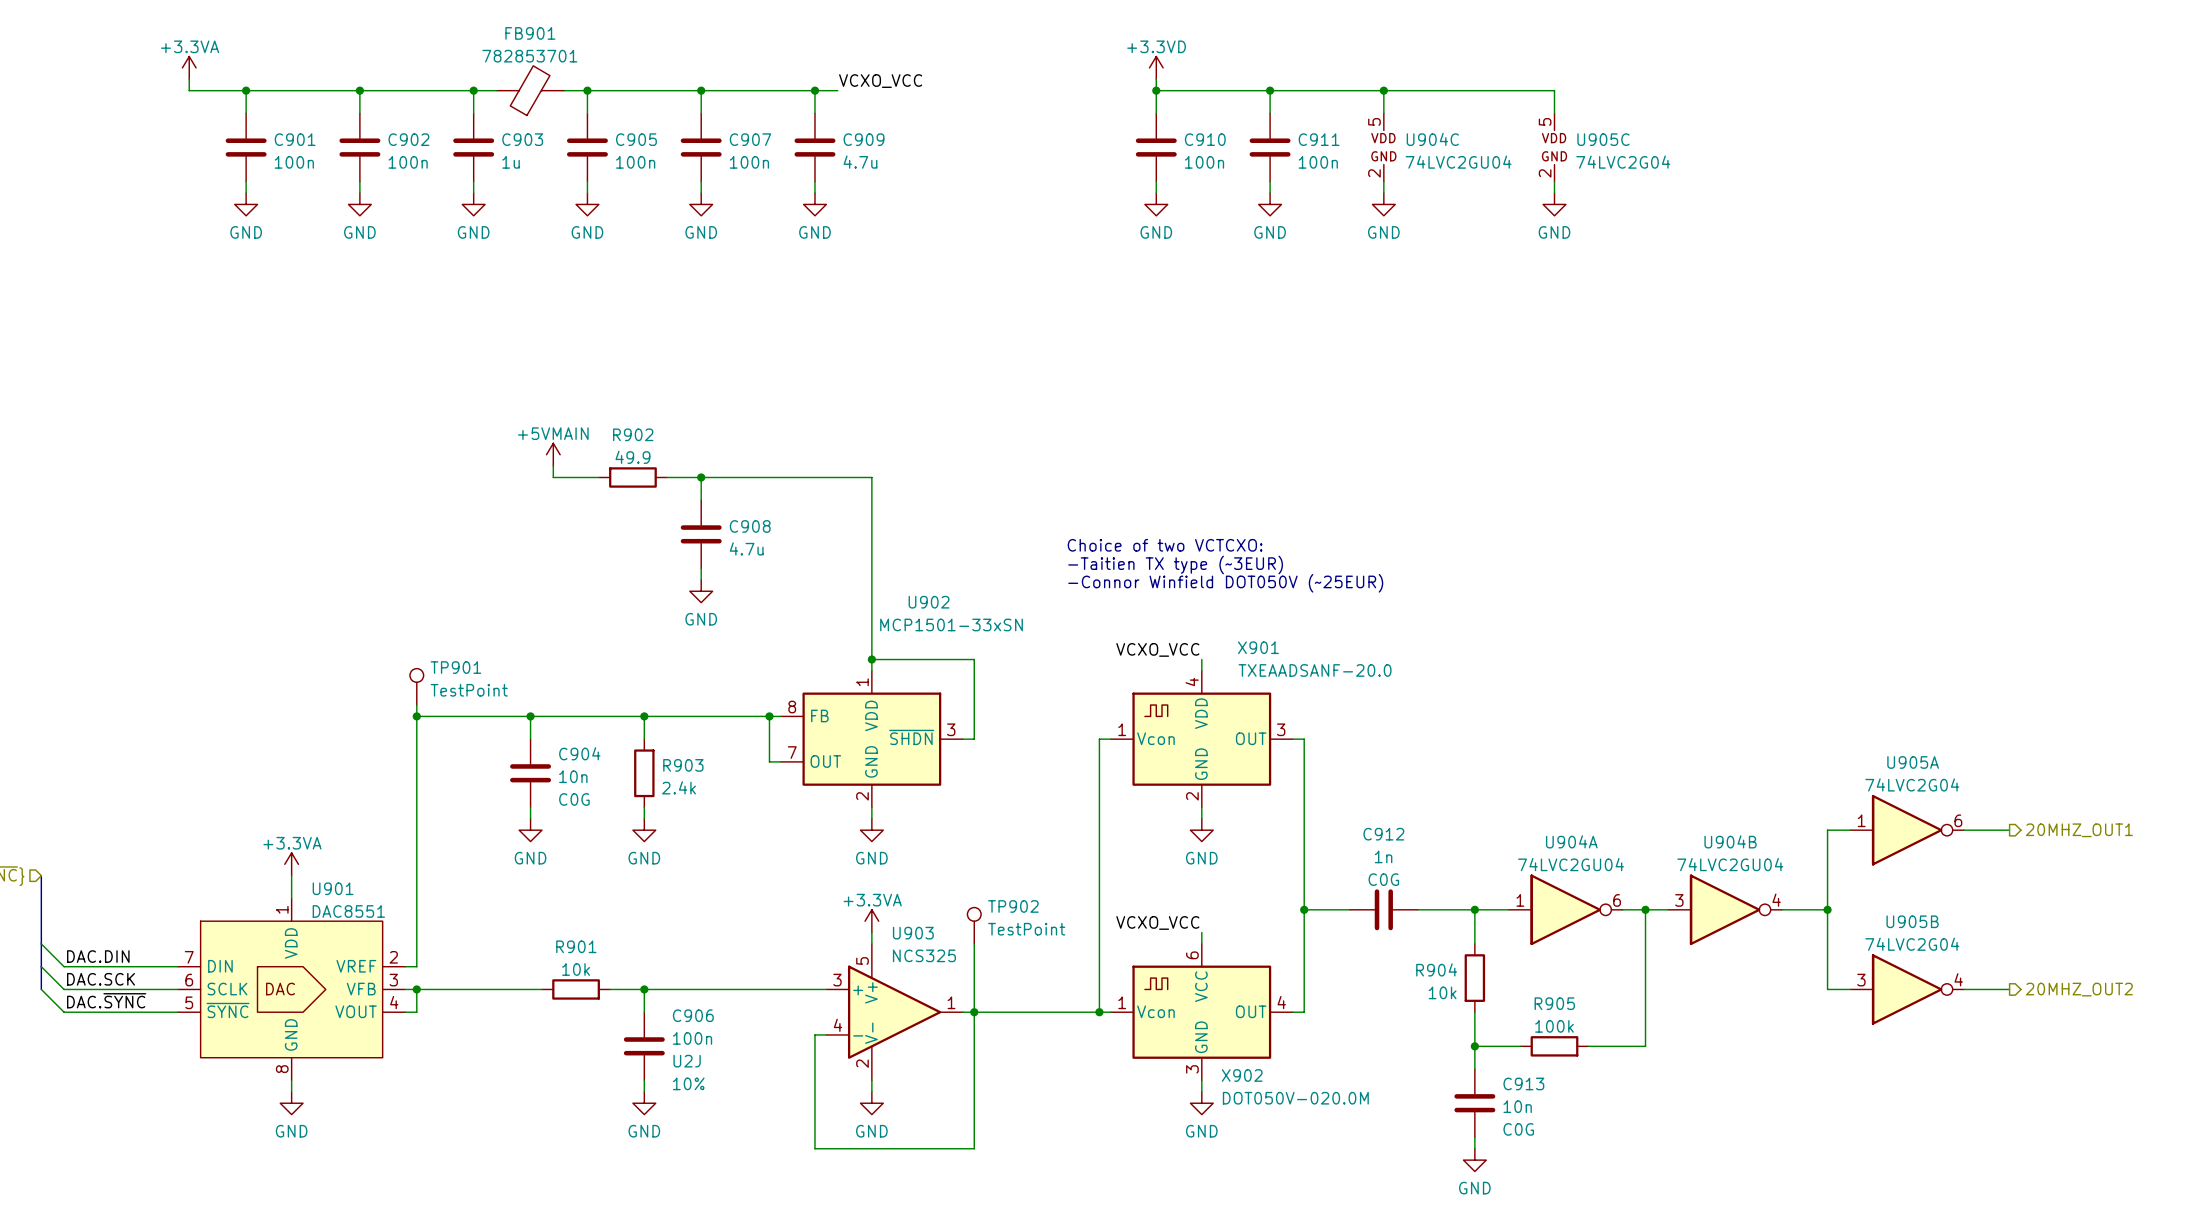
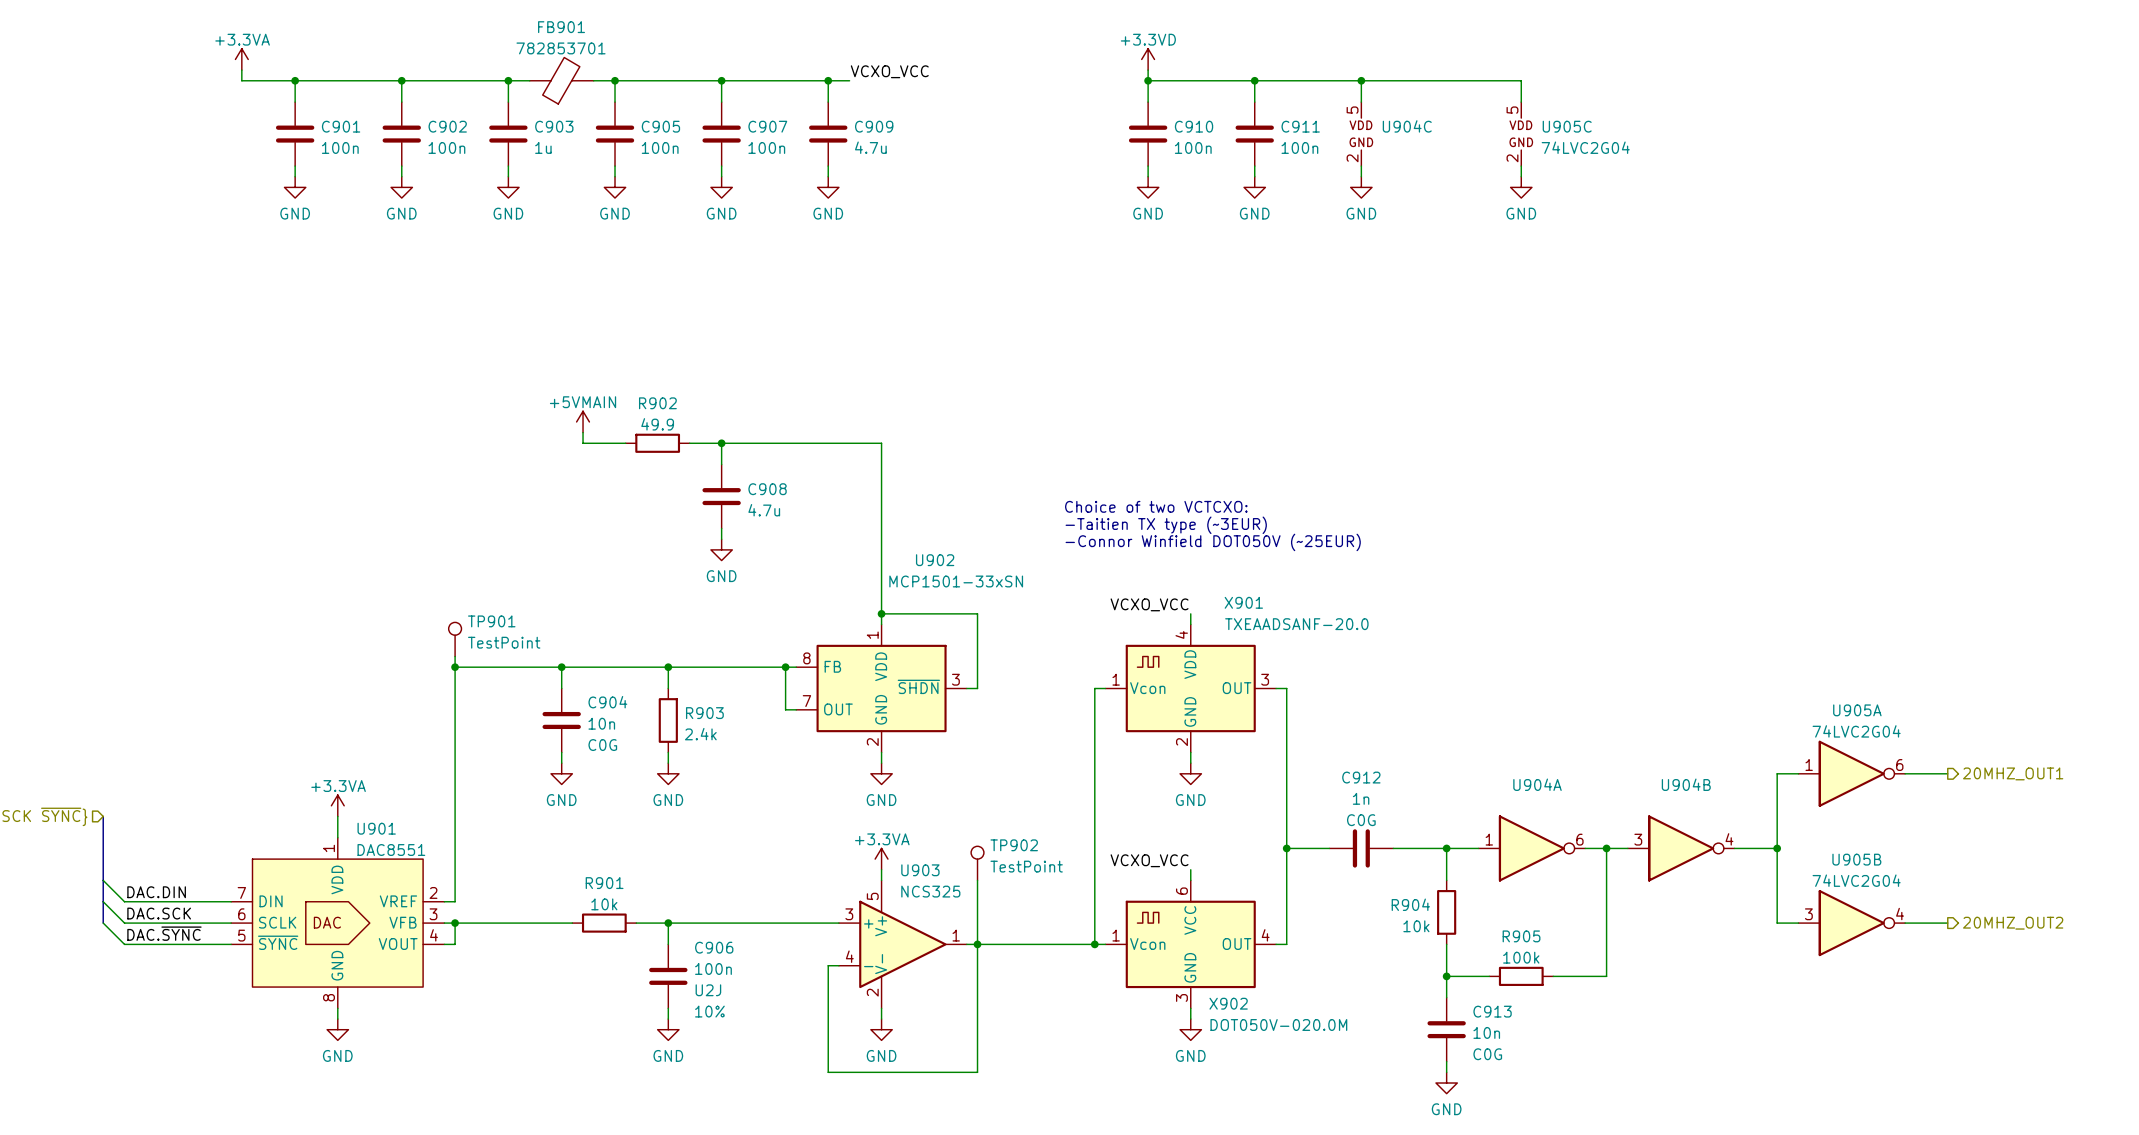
U904C value: 74LVC2GU04 (1458, 162) -> none
U904A value: 74LVC2GU04 (1571, 864) -> none
U904B value: 74LVC2GU04 (1730, 864) -> none

